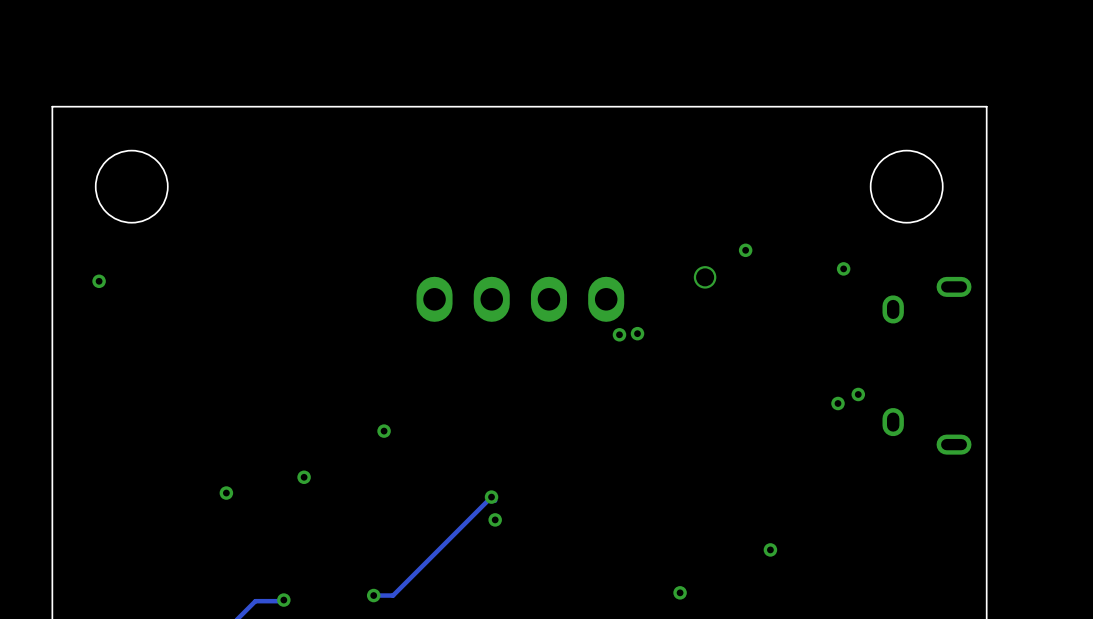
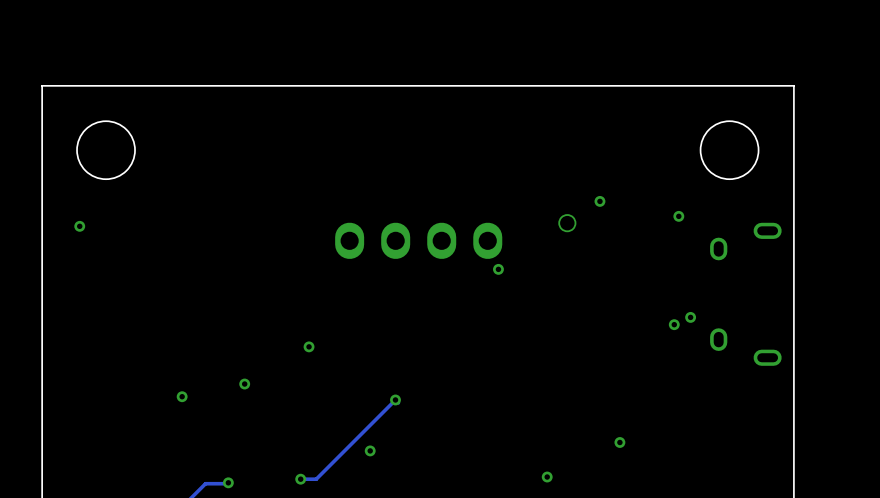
via: (637, 333) -> none
via position: (495, 519) -> (370, 450)

